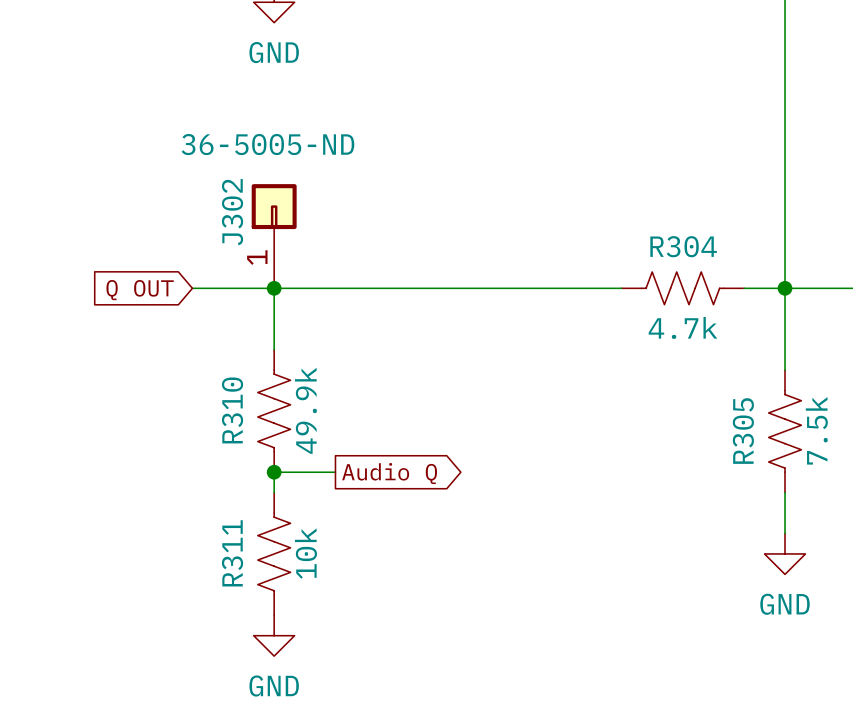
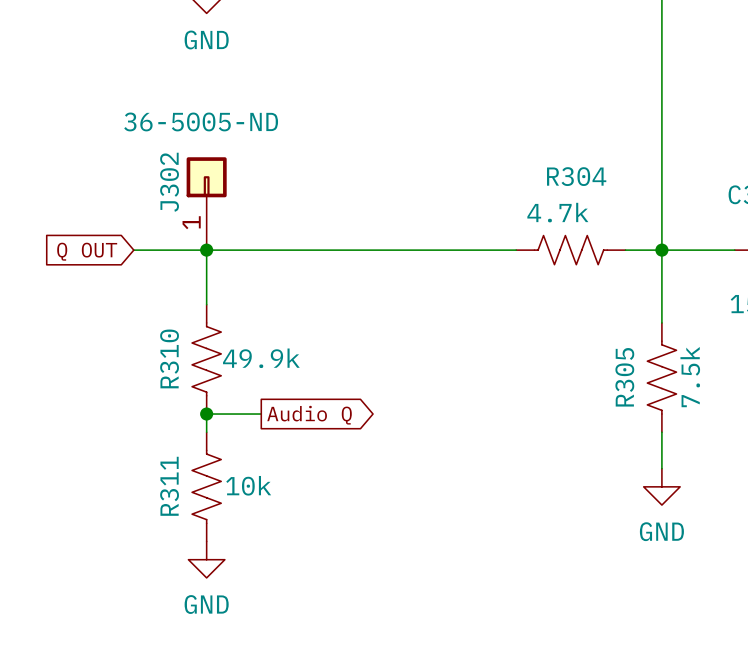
R304 name position: R304 (683, 246) -> R304 (576, 176)
R304 value position: 4.7k (682, 327) -> 4.7k (557, 212)
R310 value rotation: 0° (305, 410) -> 90° clockwise (261, 358)
R311 value rotation: 0° (305, 553) -> 90° clockwise (248, 485)

